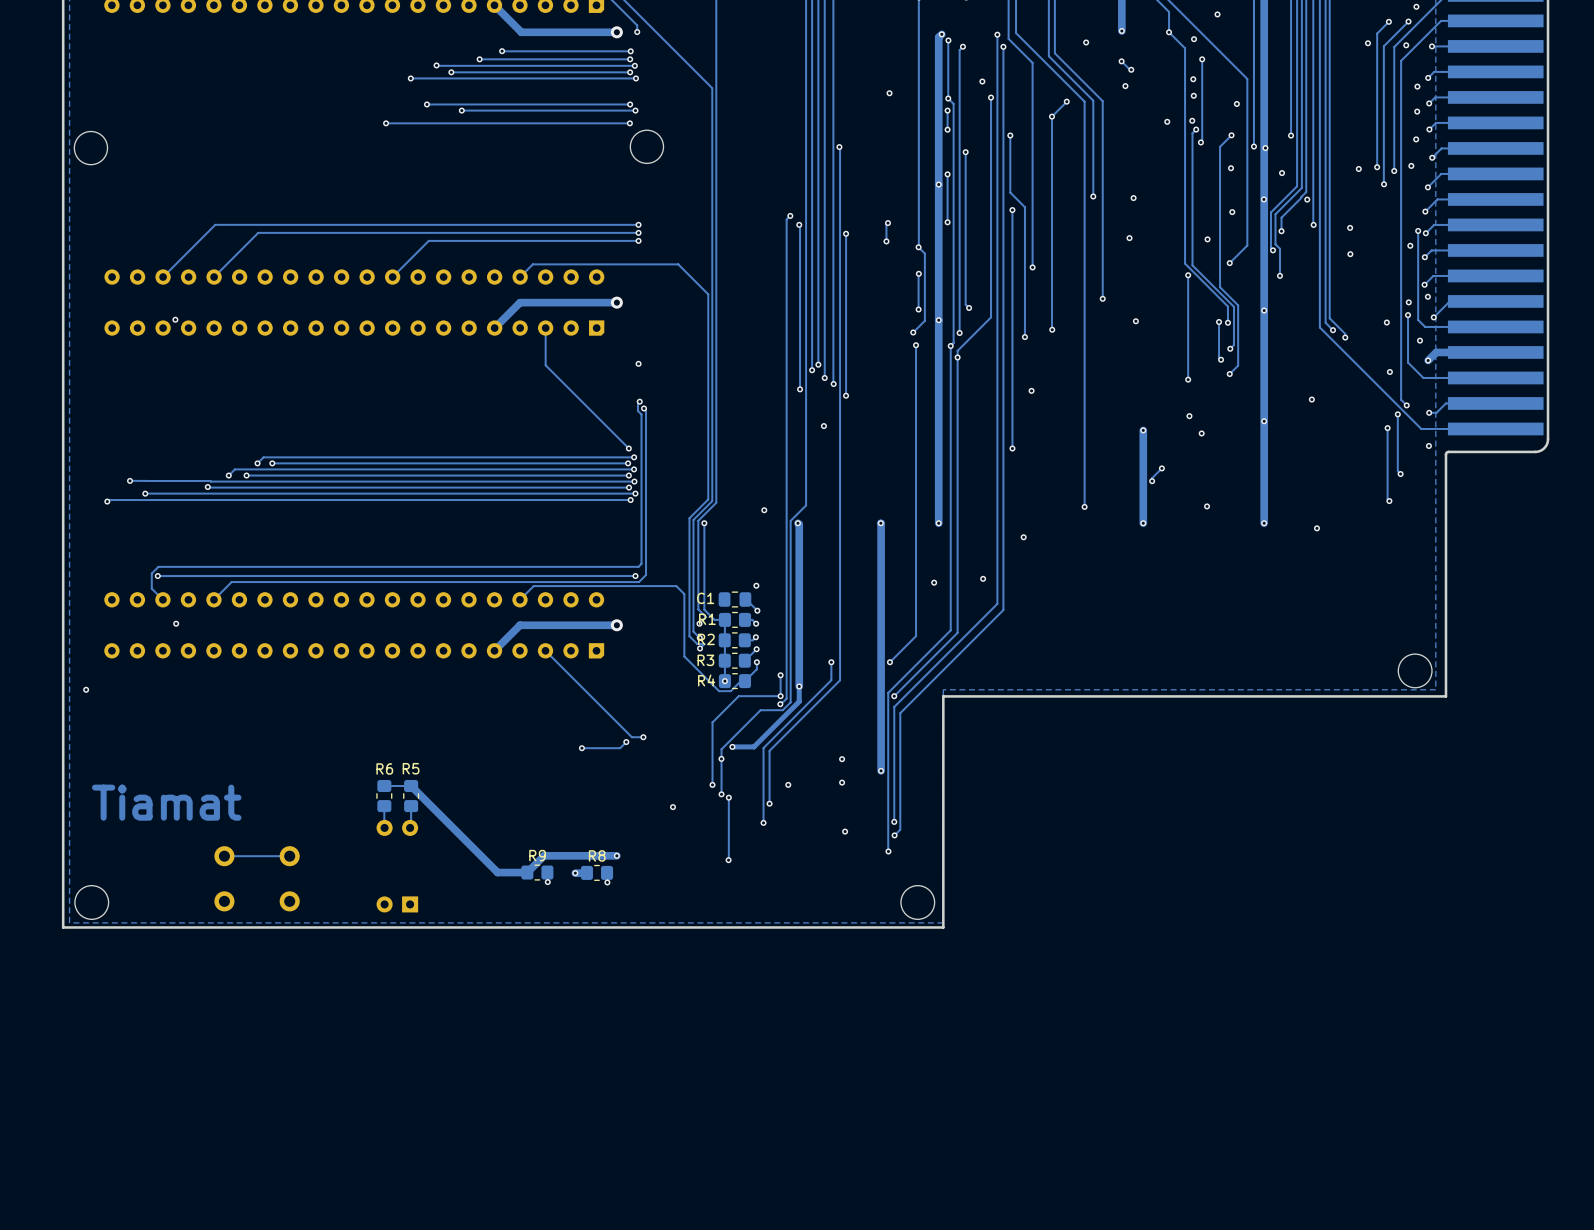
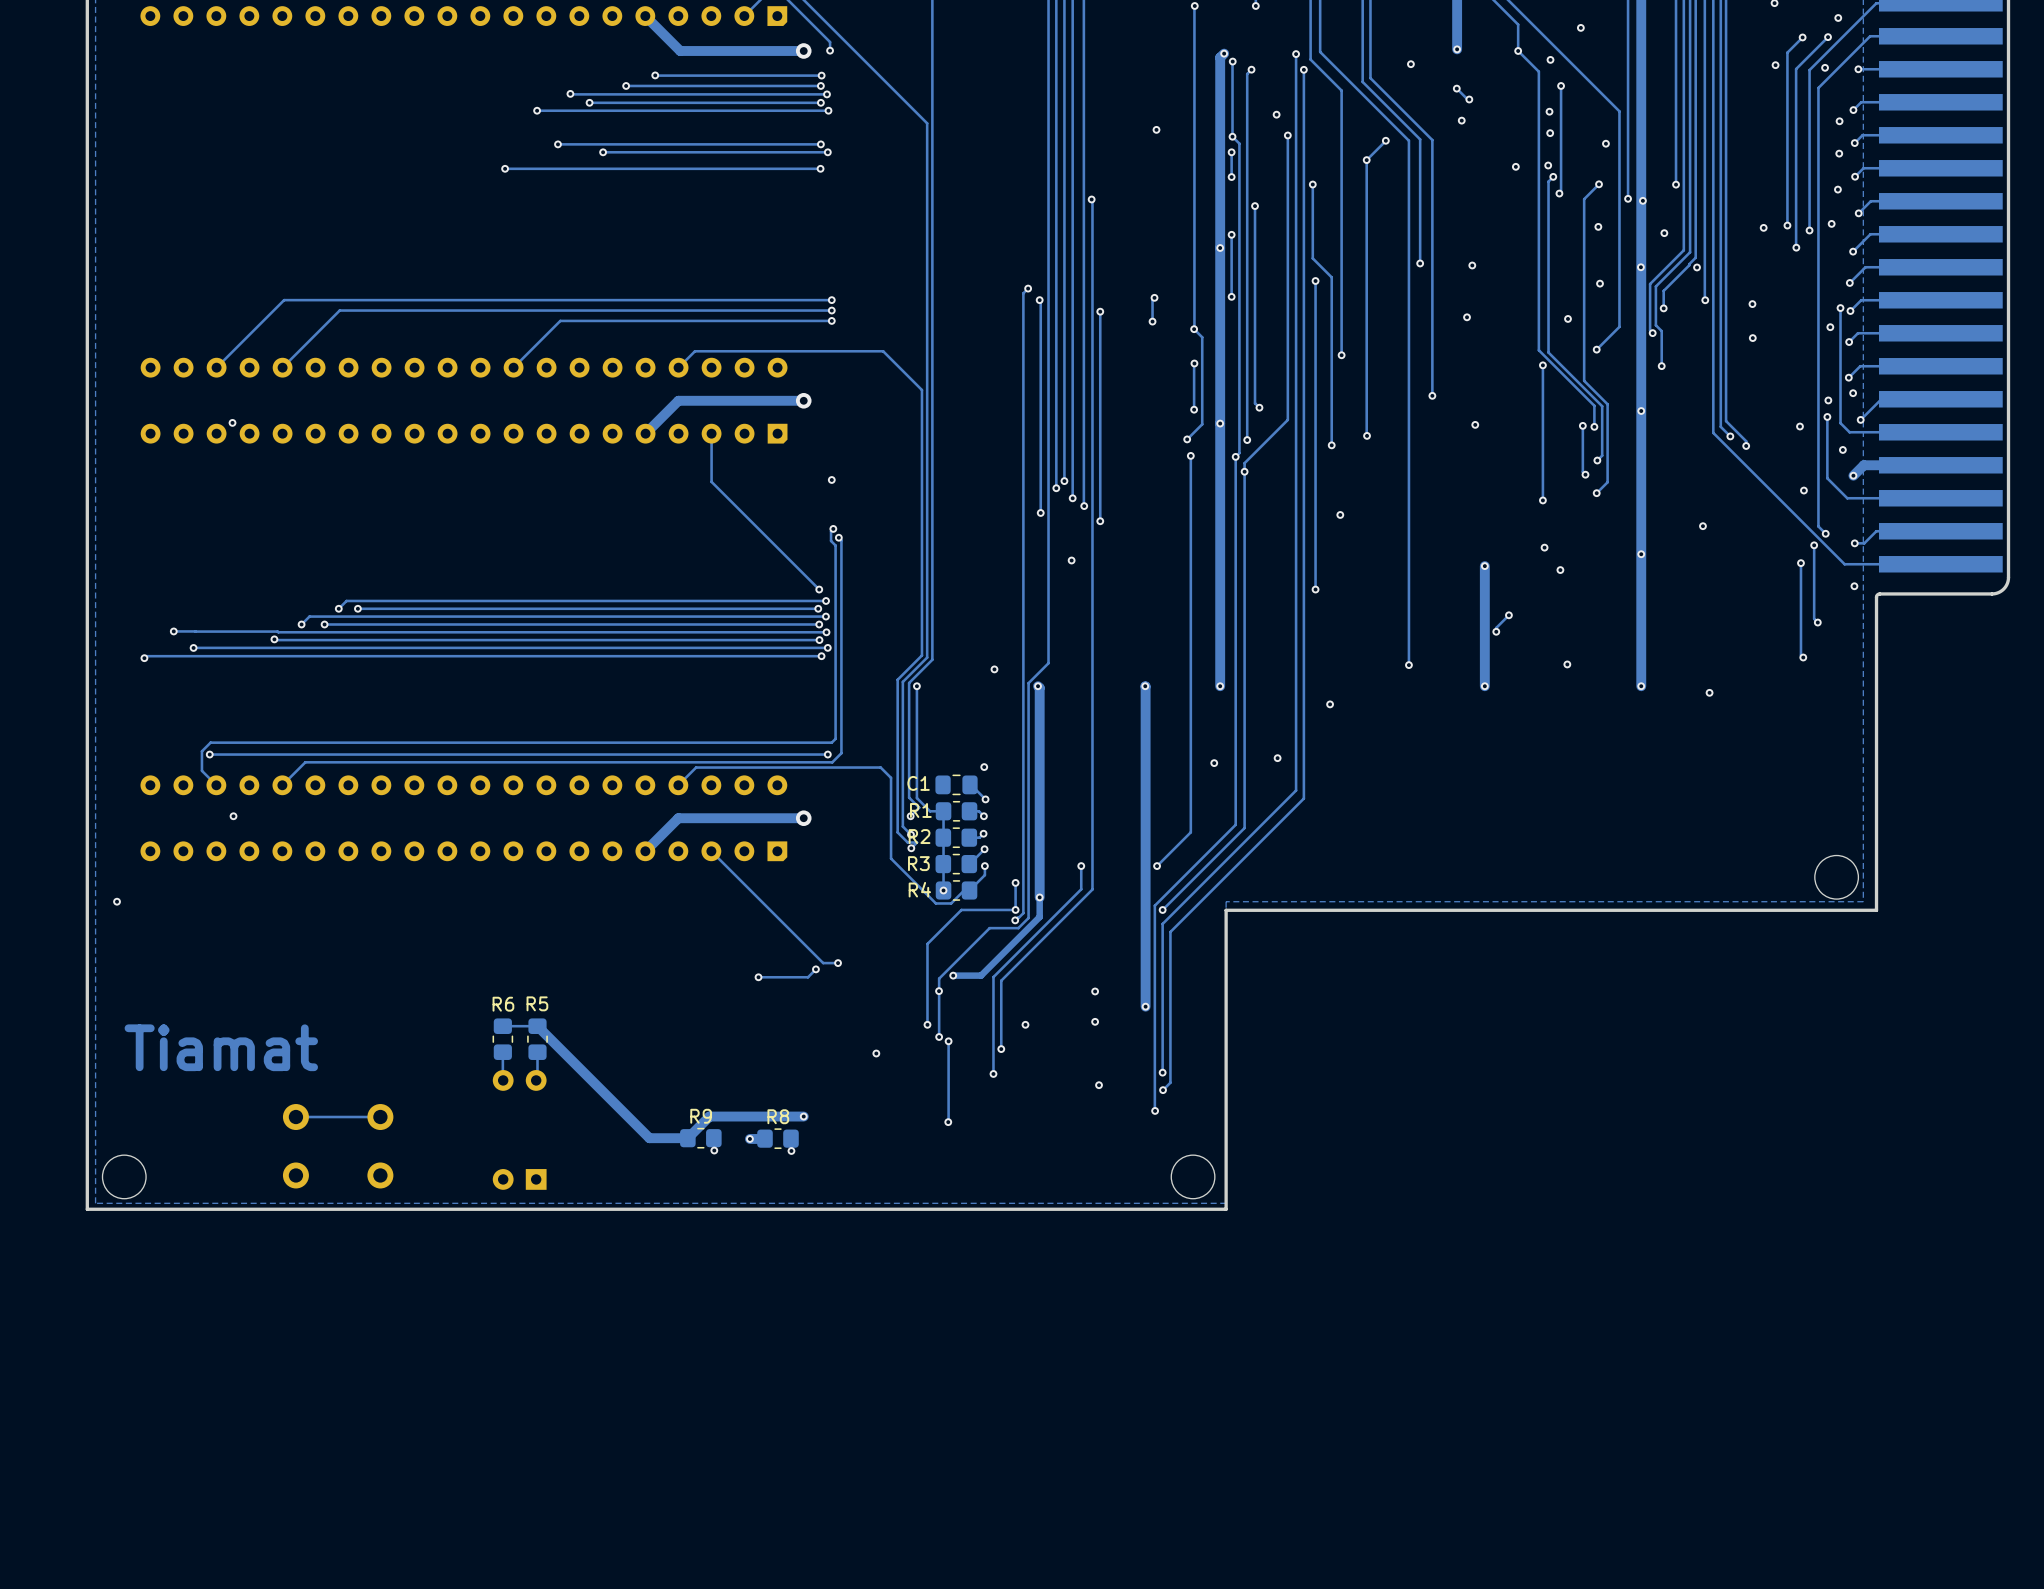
round board edge: [630, 129, 664, 164] -> none
round board edge: [74, 131, 108, 165] -> none

